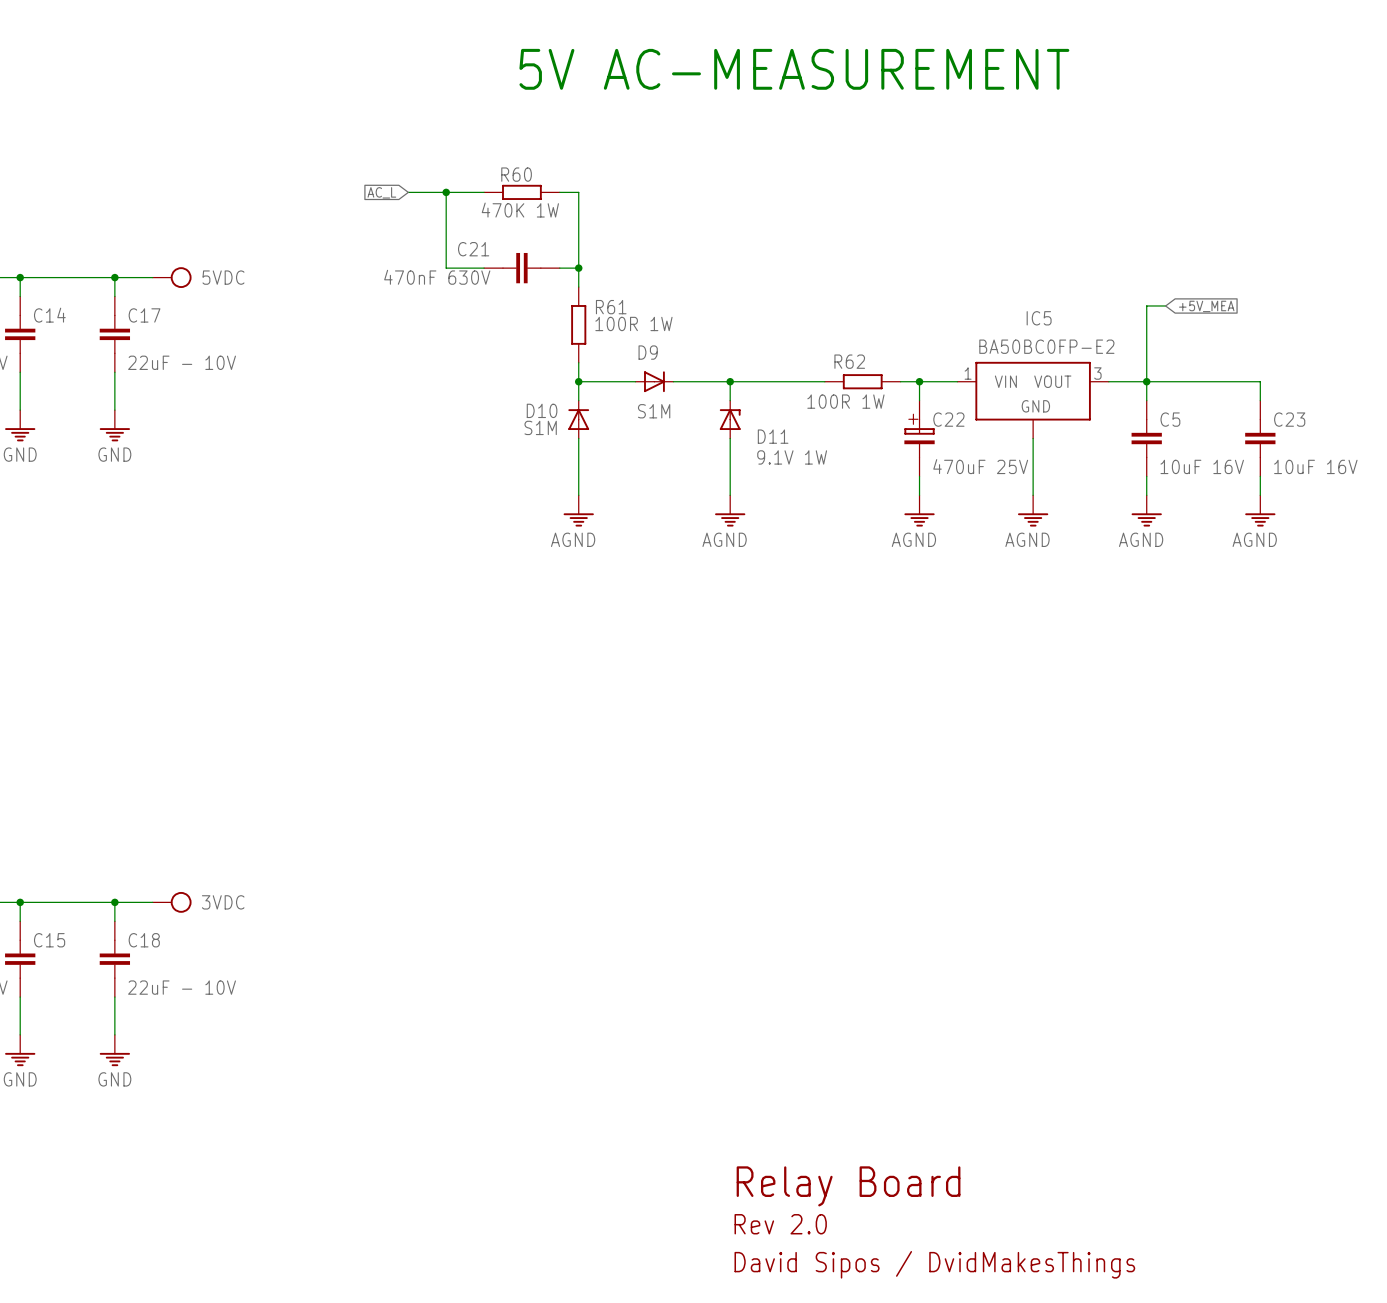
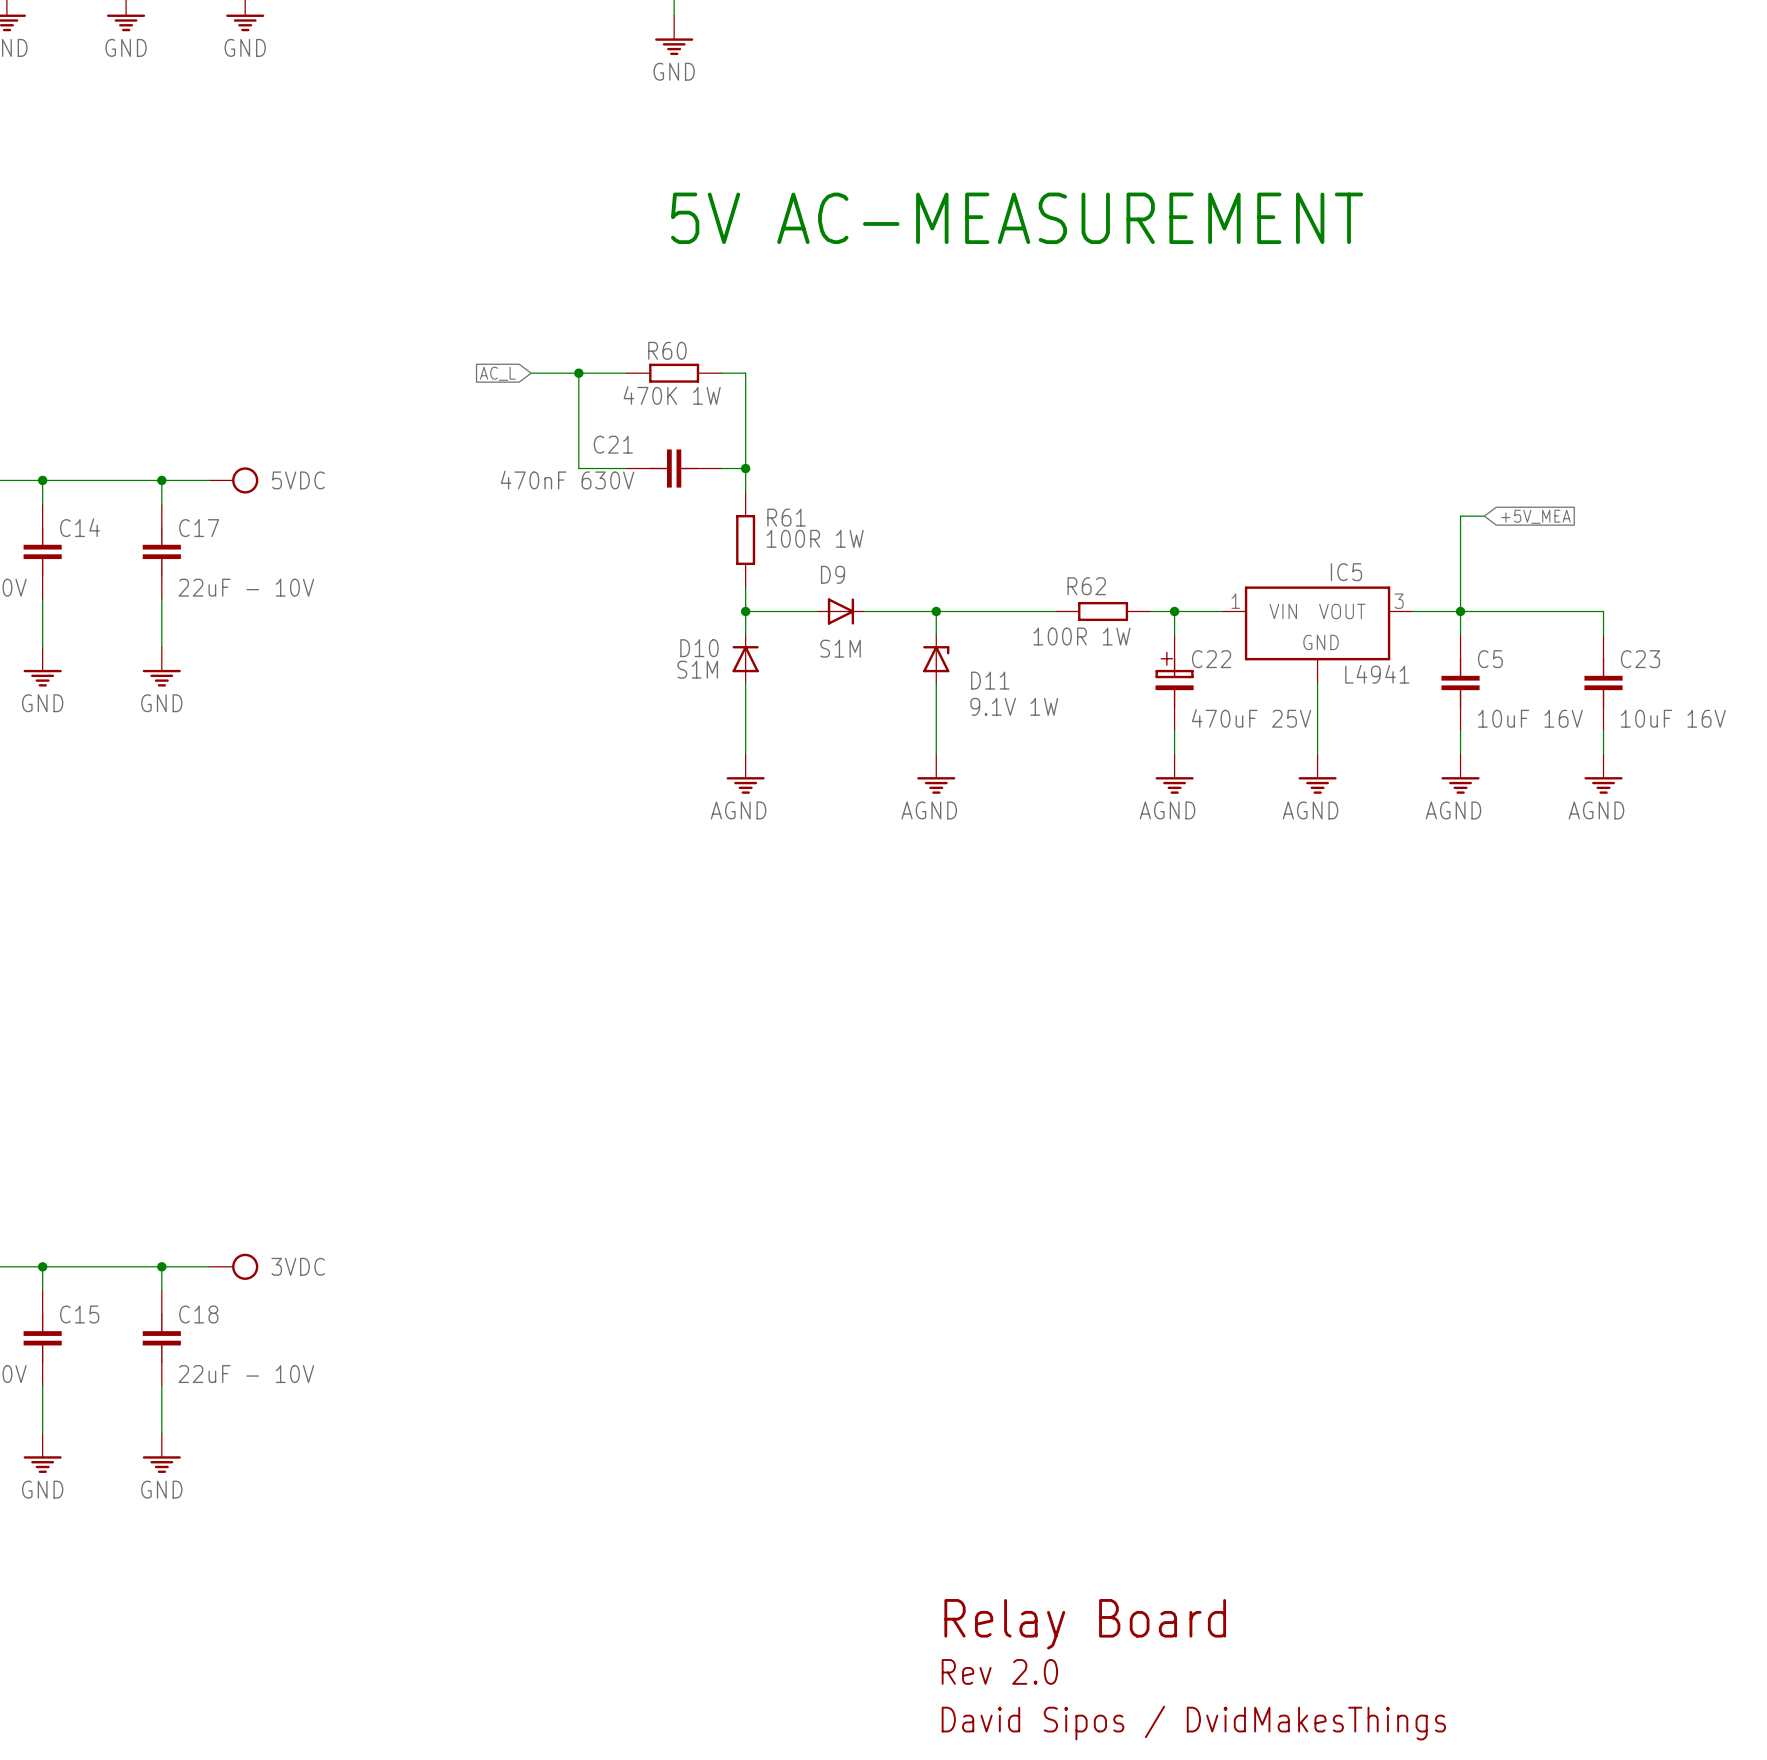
IC5 name position: IC5 (1039, 318) -> IC5 (1346, 572)
text: BA50BC0FP-E2 (1046, 346) -> none
IC5 text: none -> L4941 (1377, 674)

